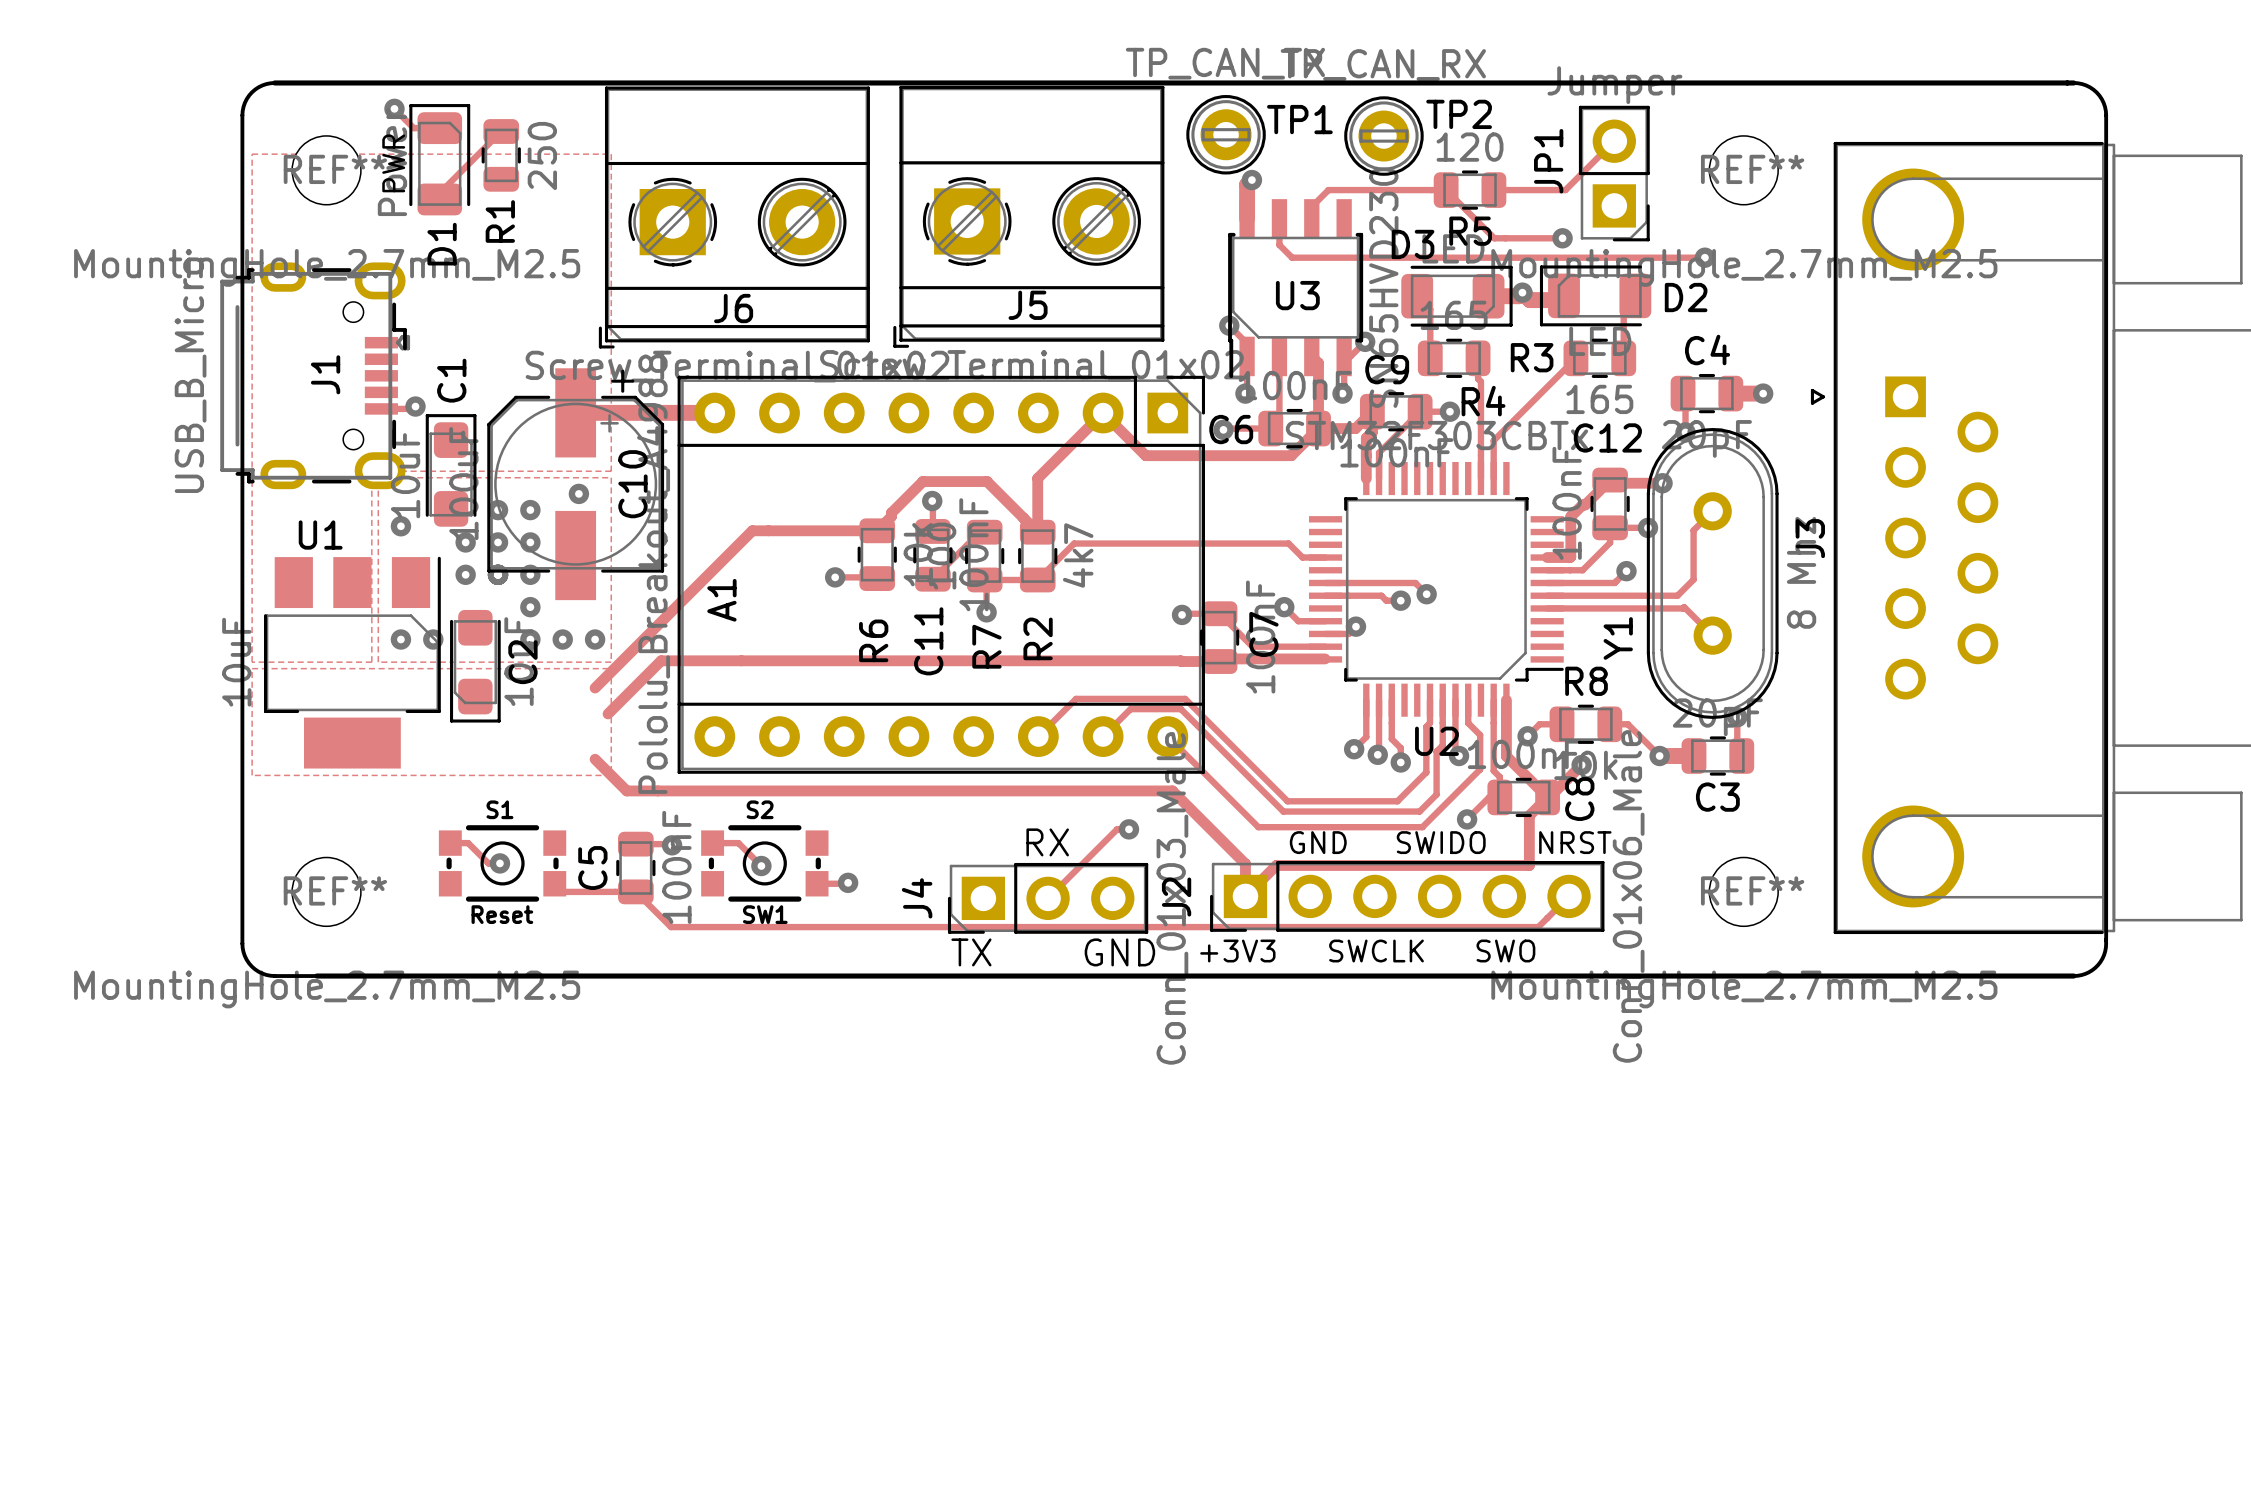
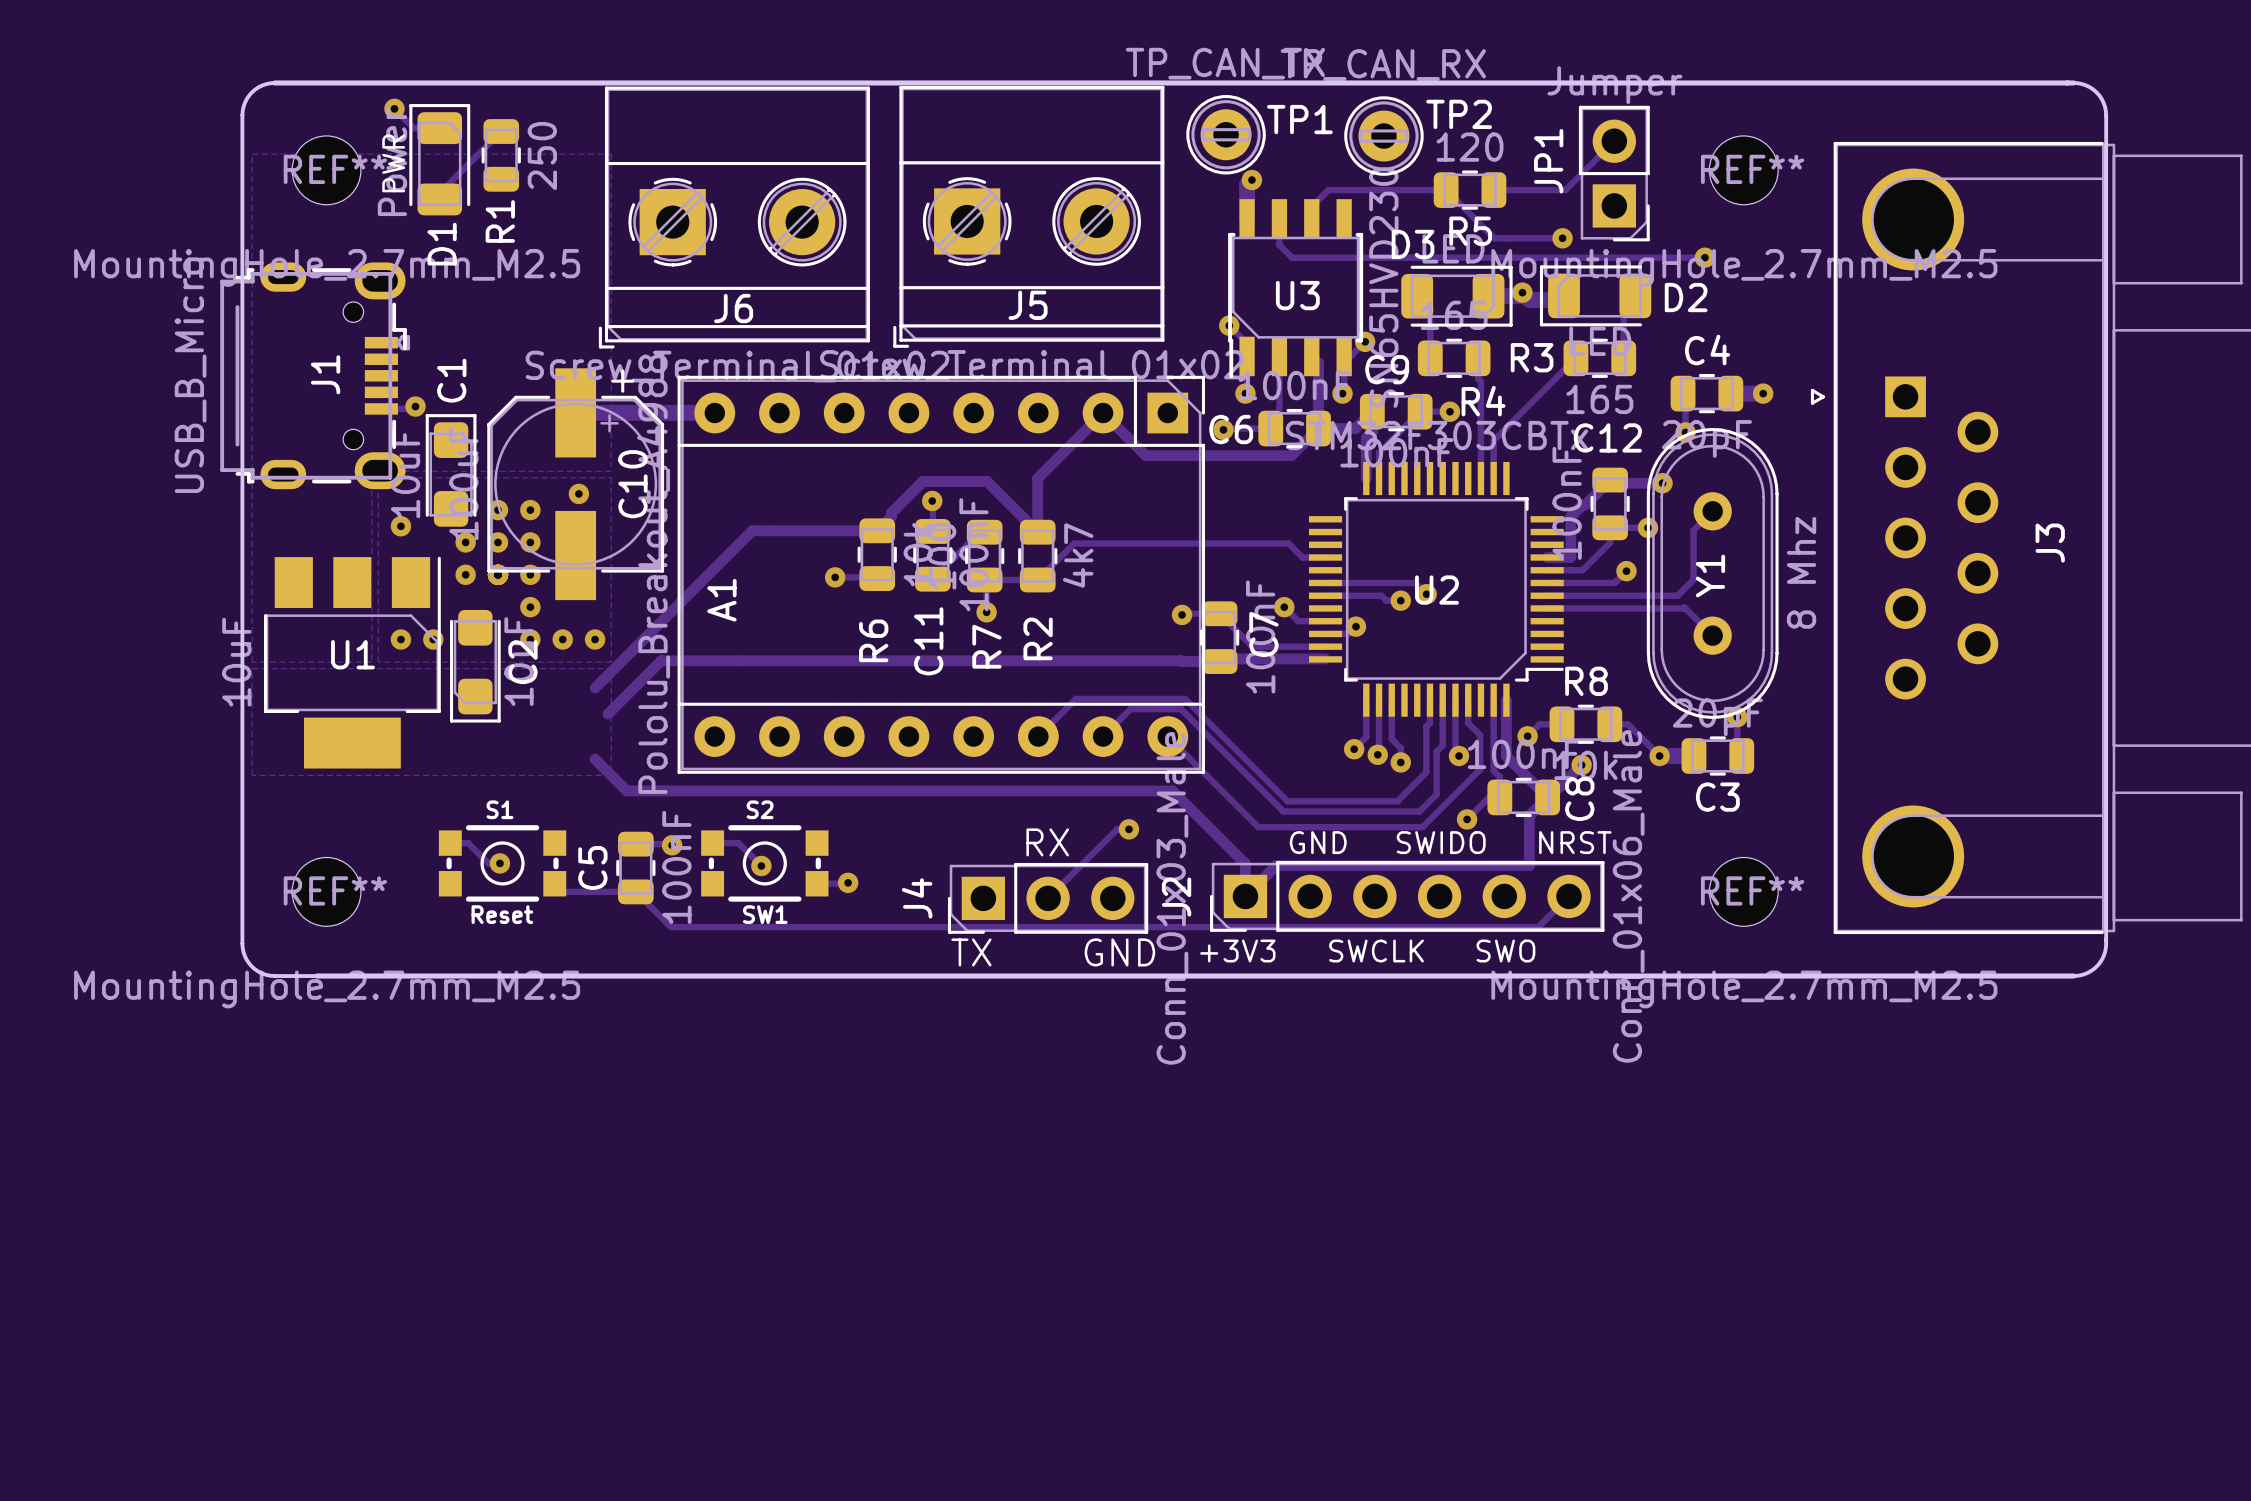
U1 name position: U1 (320, 535) -> U1 (353, 654)
J3 name position: J3 (1810, 538) -> J3 (2050, 543)
Y1 name position: Y1 (1618, 638) -> Y1 (1710, 576)
U2 name position: U2 (1436, 741) -> U2 (1436, 590)

